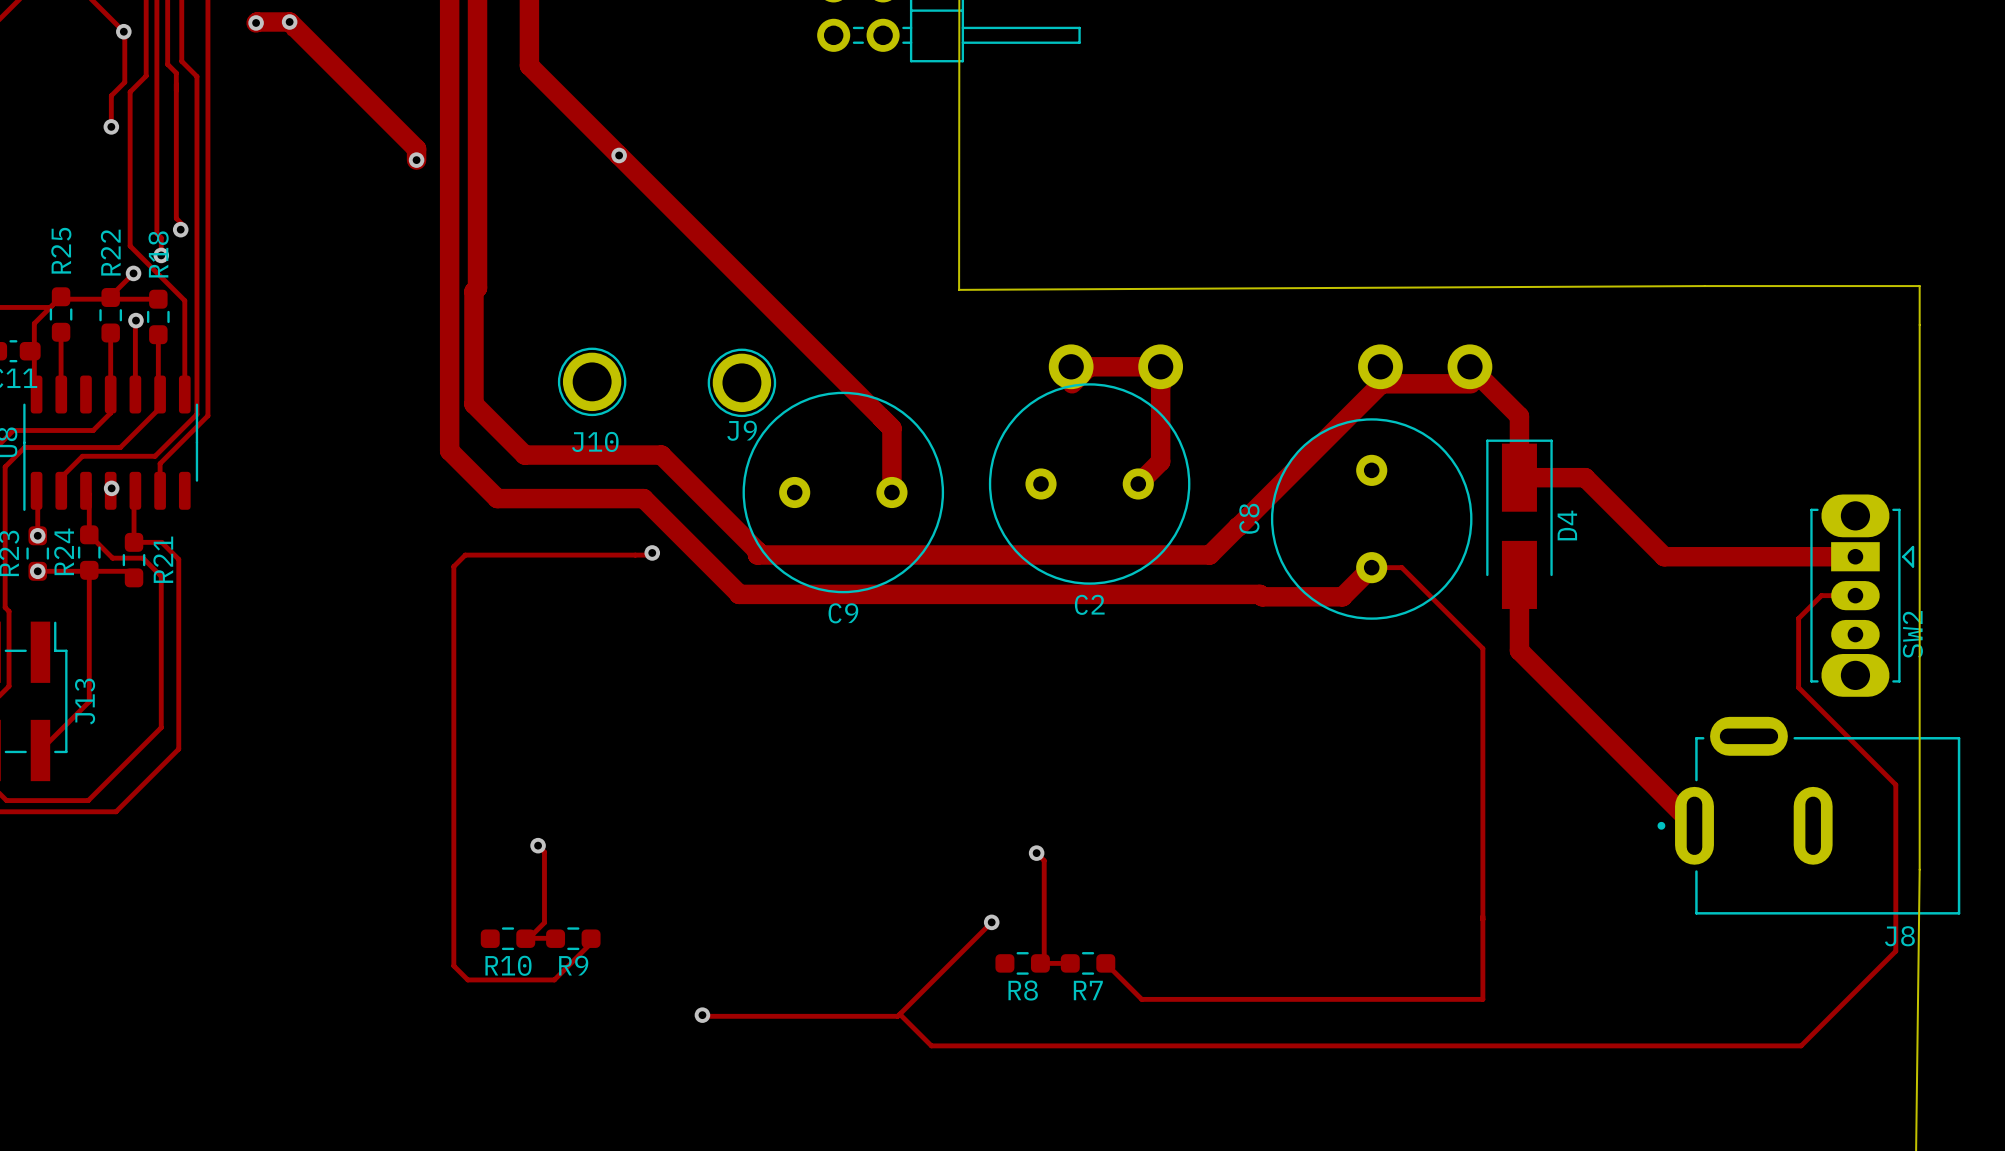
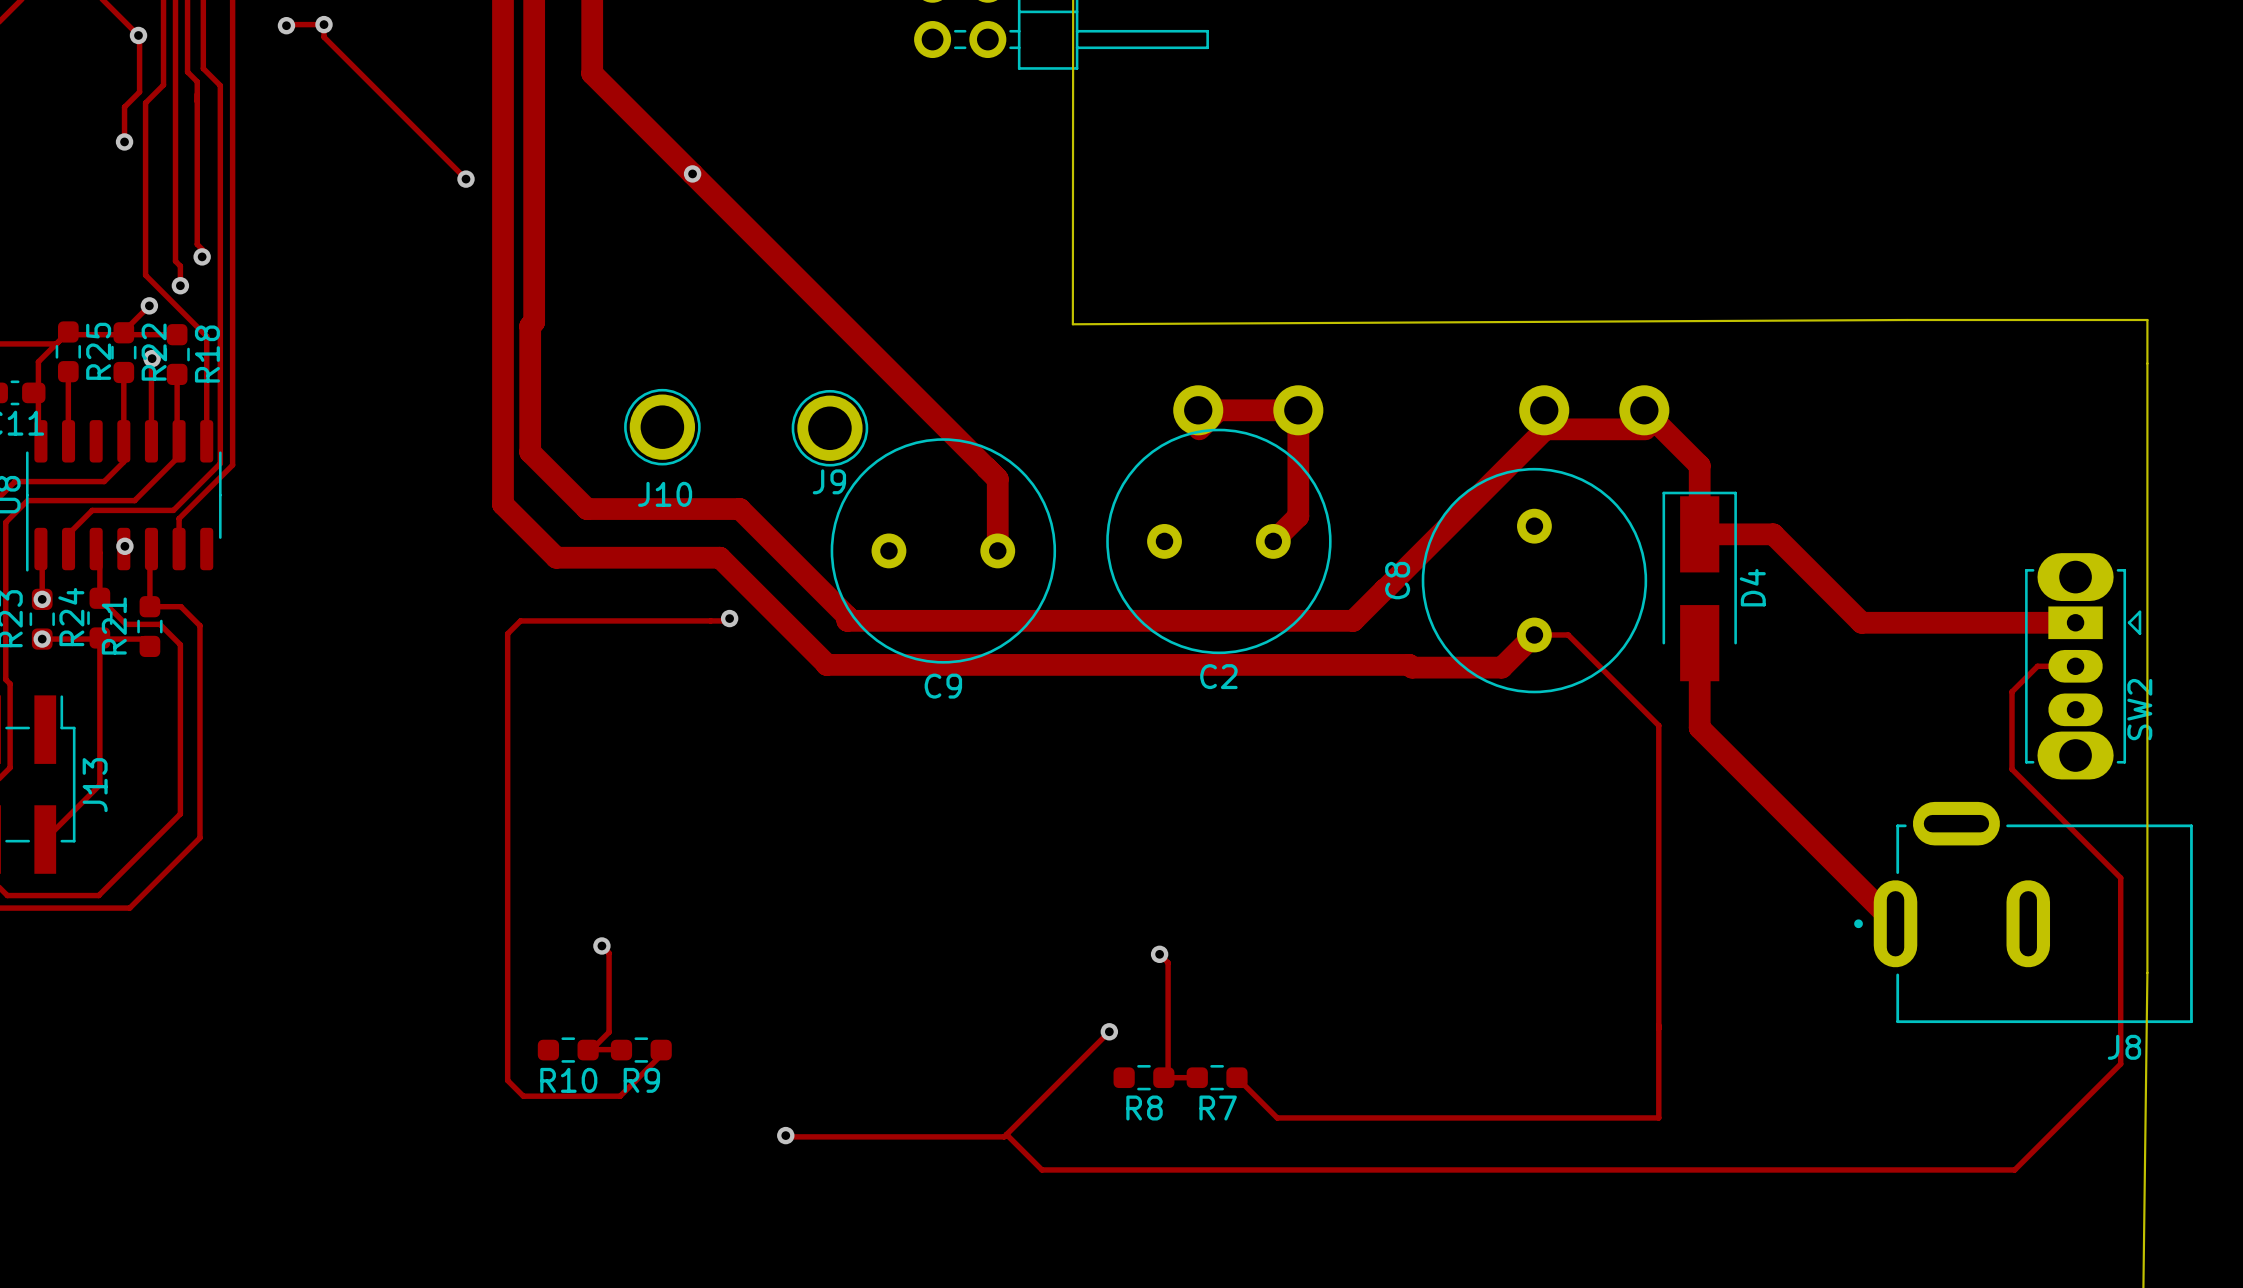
track: (256, 22) (289, 21) (416, 148) (416, 160) -> (324, 37) (466, 179)
R25 name position: R25 (61, 250) -> R25 (98, 351)
R22 name position: R22 (110, 252) -> R22 (154, 352)
R18 name position: R18 (158, 254) -> R18 (207, 354)
R21 name position: R21 (163, 559) -> R21 (114, 626)

